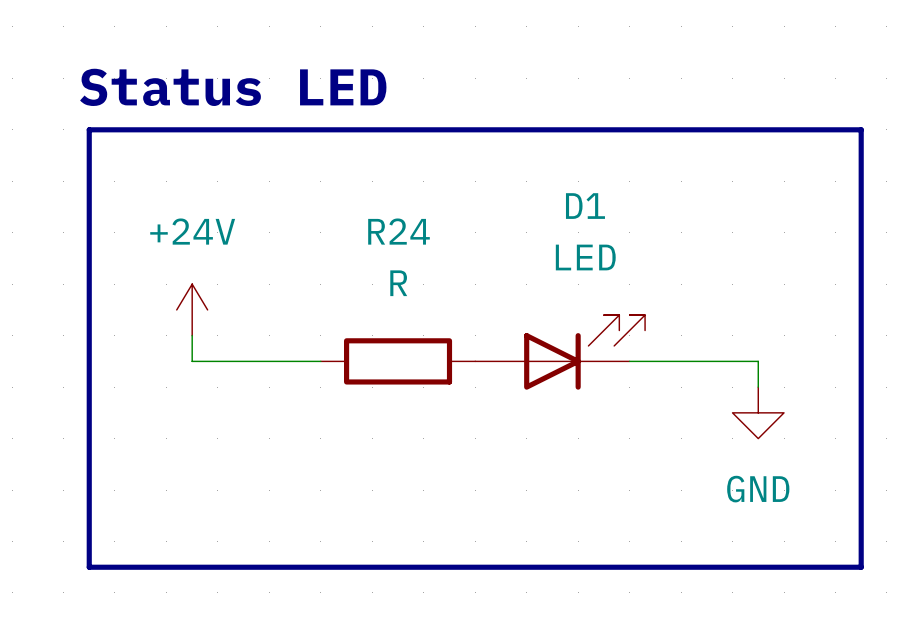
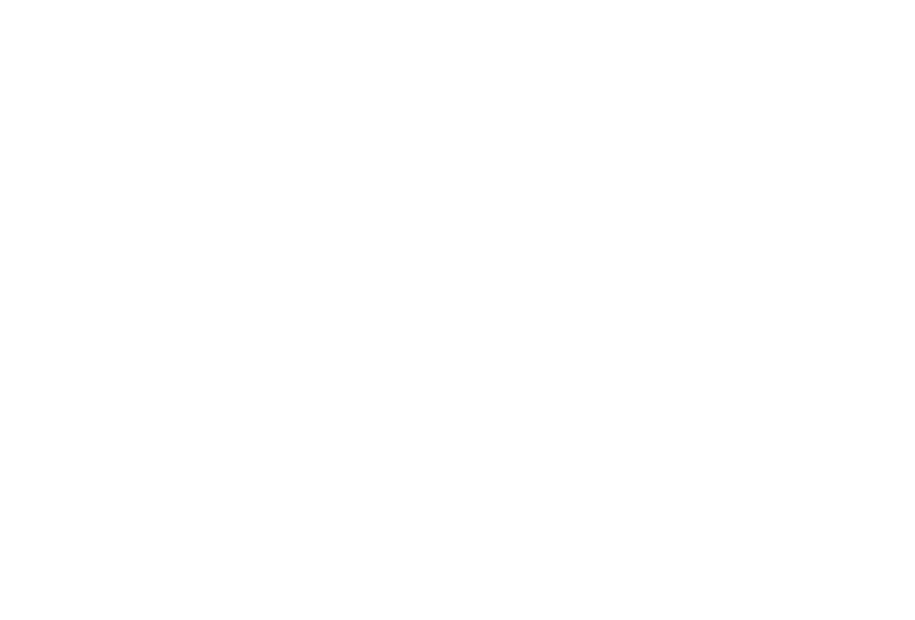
text: Status LED (233, 87) -> none
line: (89, 129) (861, 129) (861, 567) (89, 567) (89, 129) -> none
power symbol: +24V (192, 309) -> none
wire: (192, 335) (192, 361) (320, 361) -> none
D1: LED (560, 352) -> none
R24: R (398, 361) -> none
wire: (629, 361) (758, 361) (758, 387) -> none
power symbol: GND (758, 412) -> none

